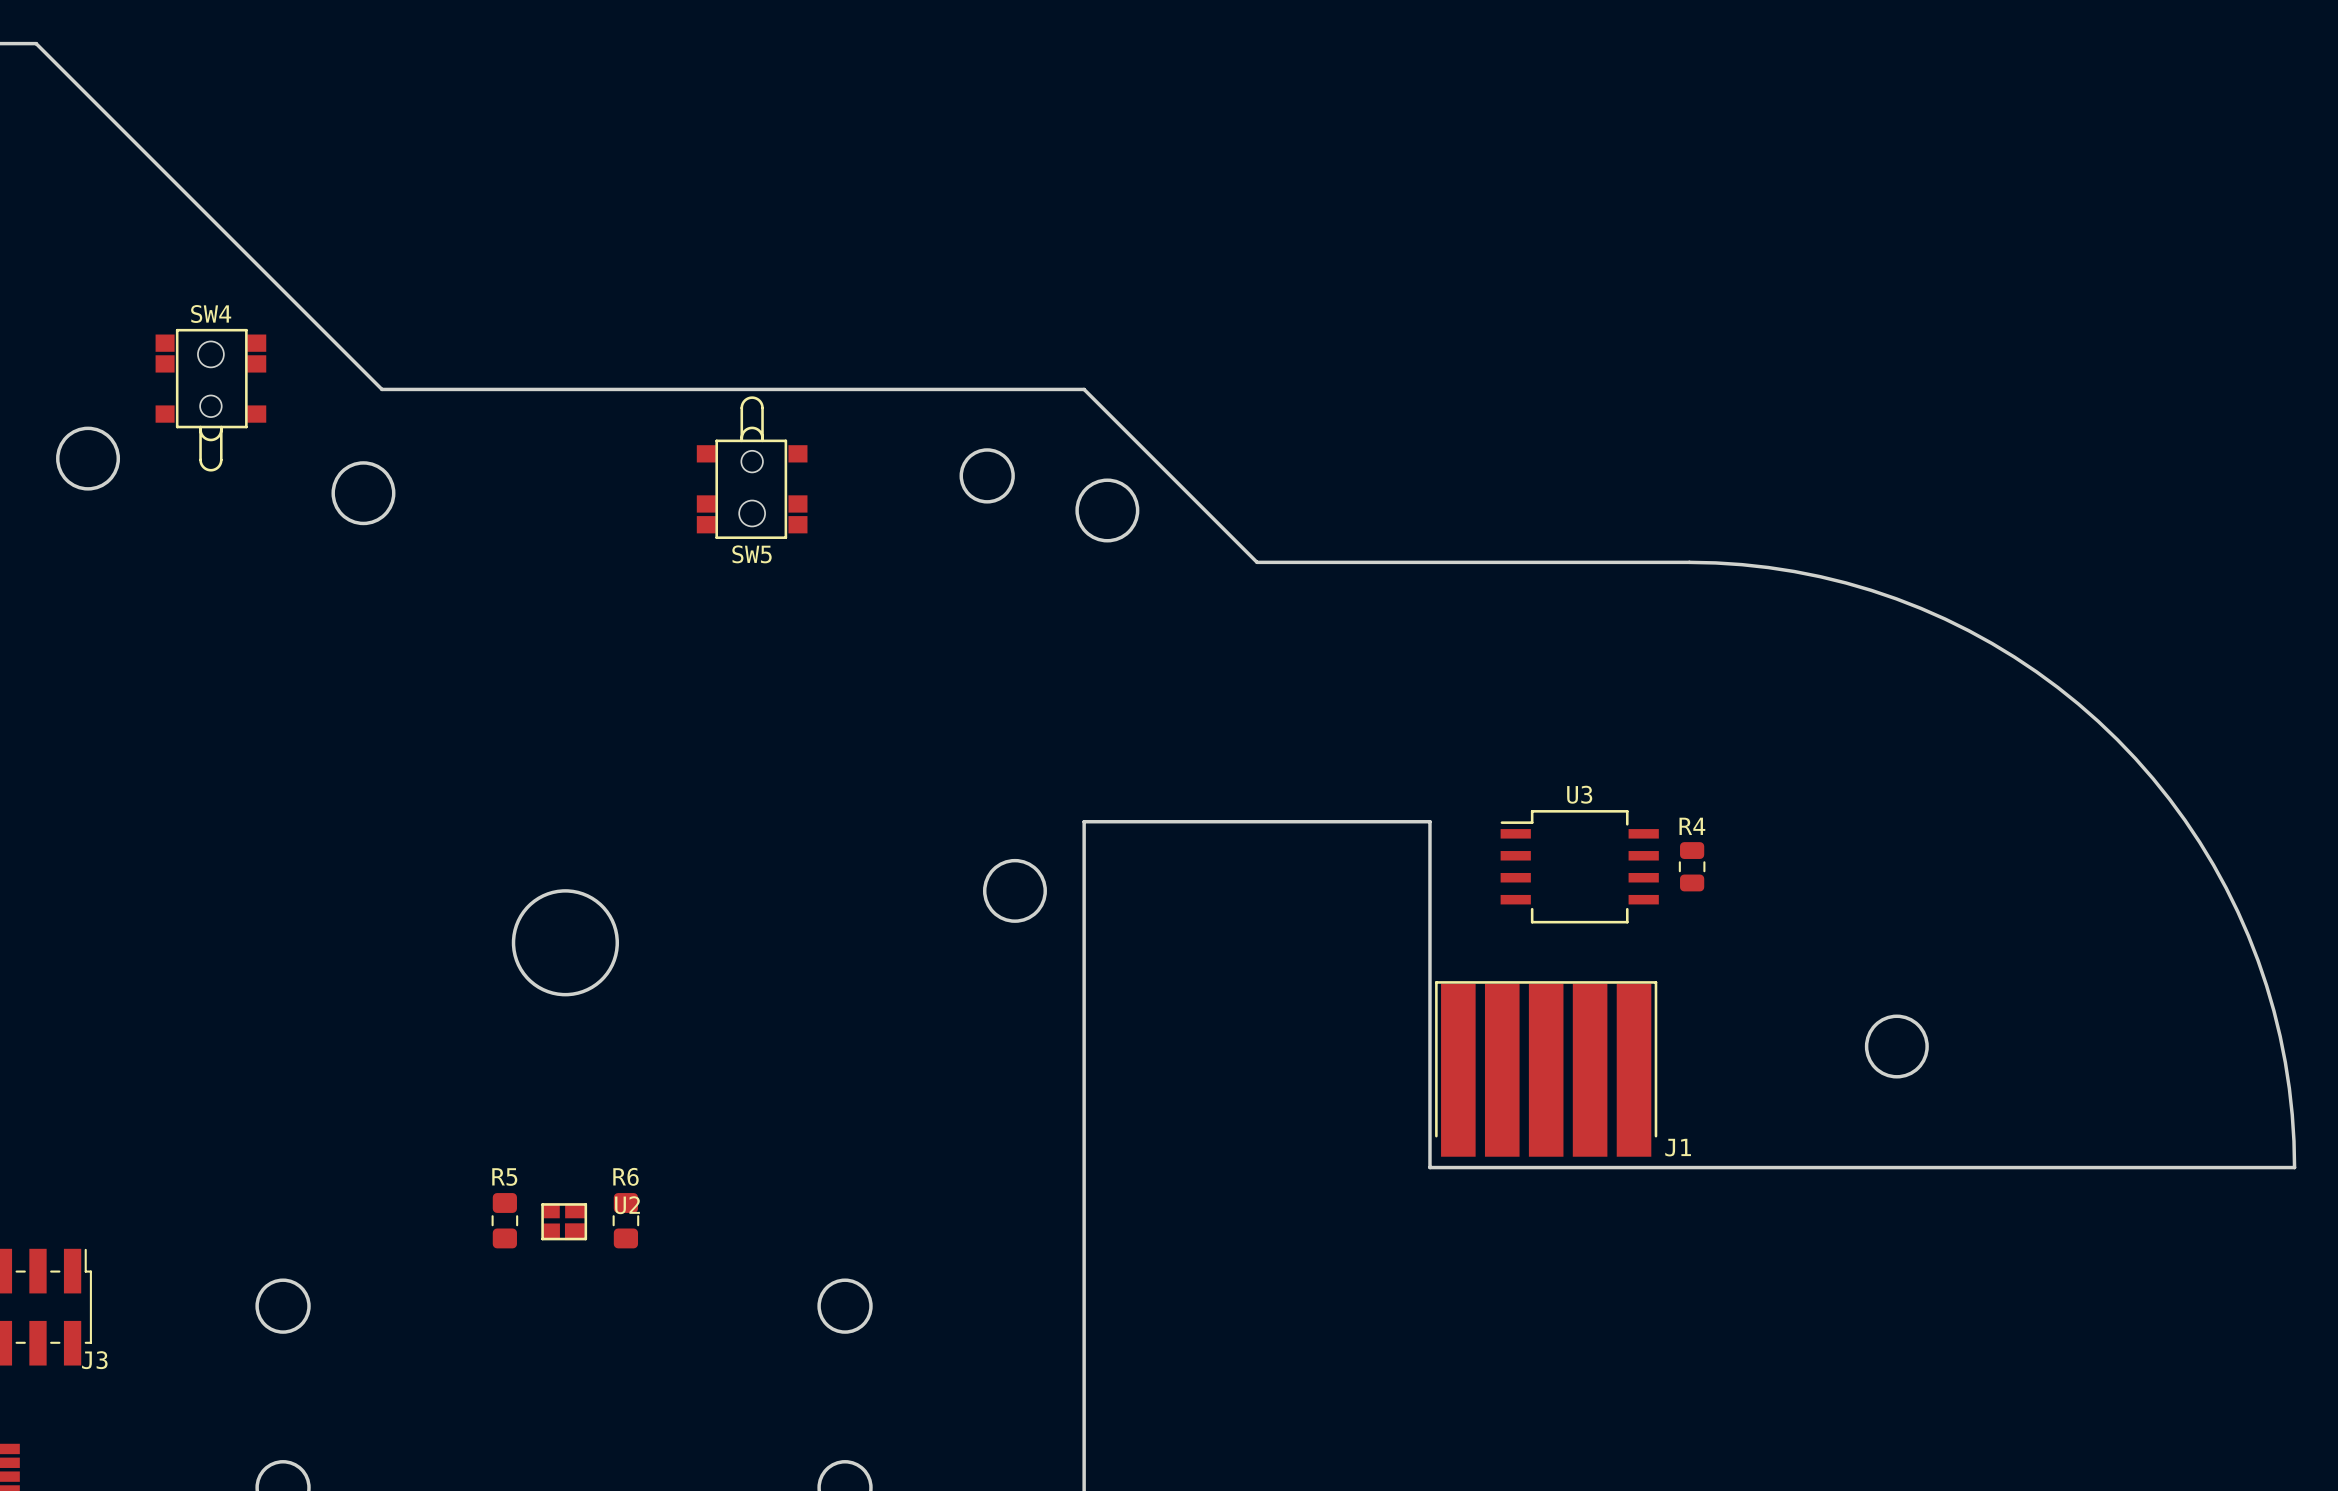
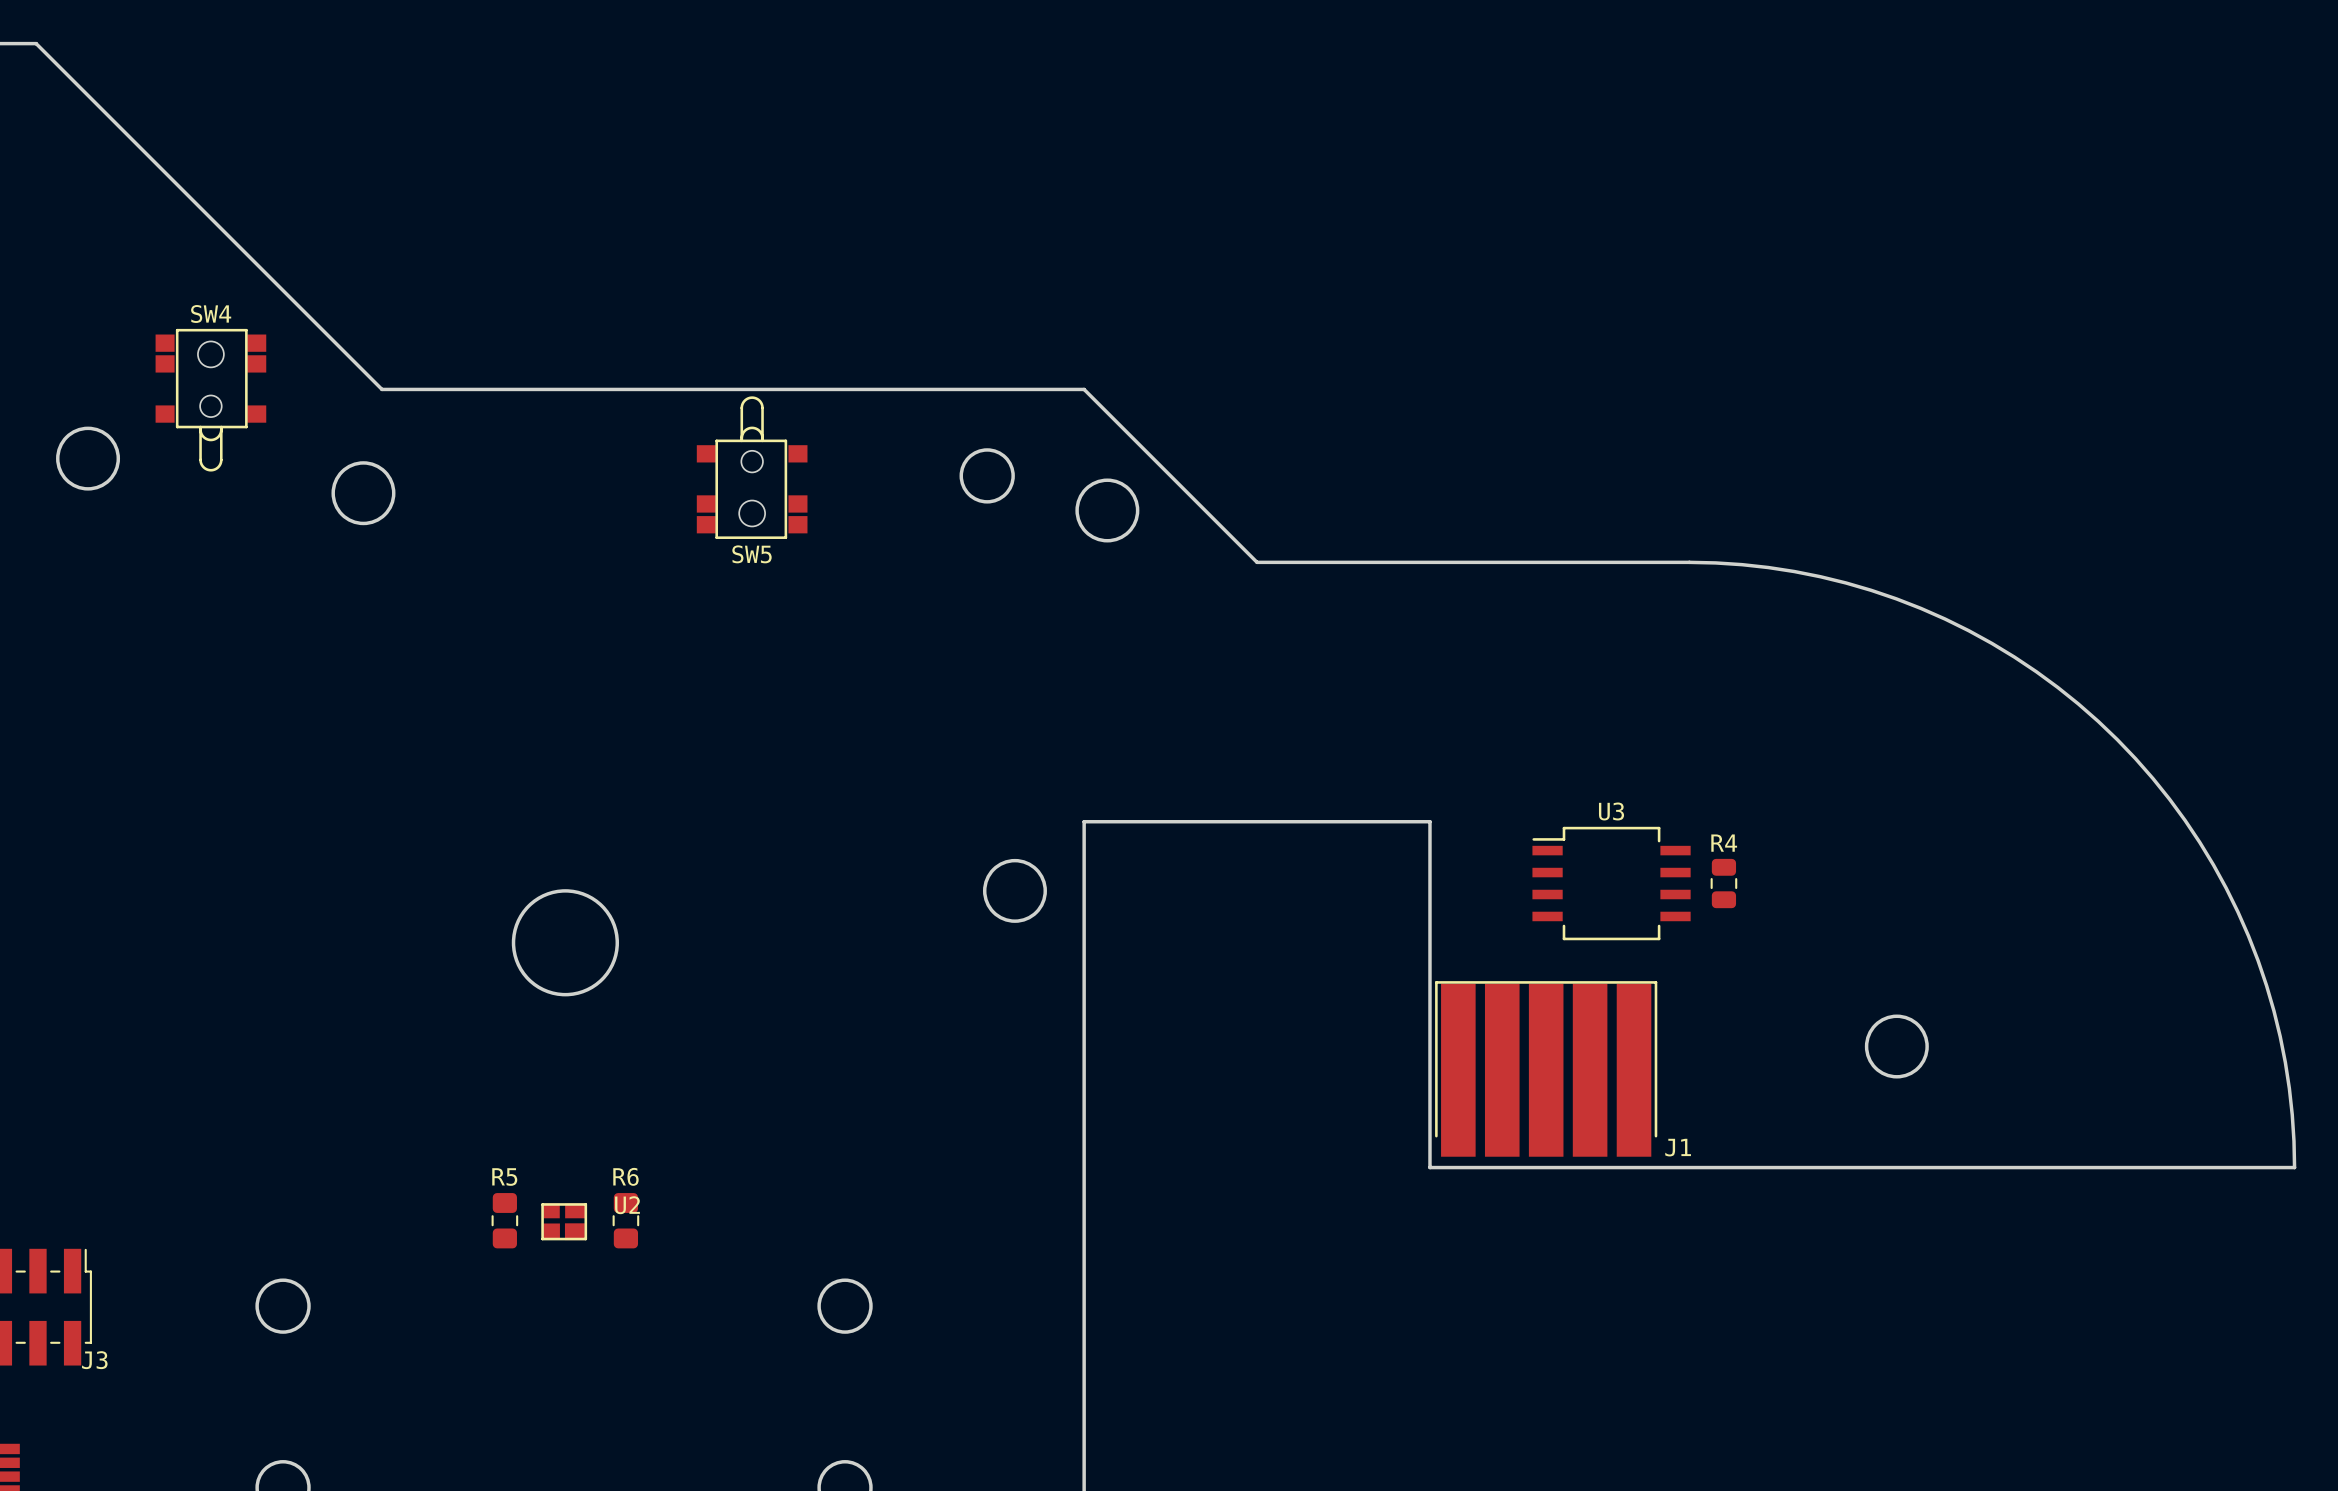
U3 position: (1579, 866) -> (1611, 883)
R4 position: (1692, 866) -> (1723, 883)

